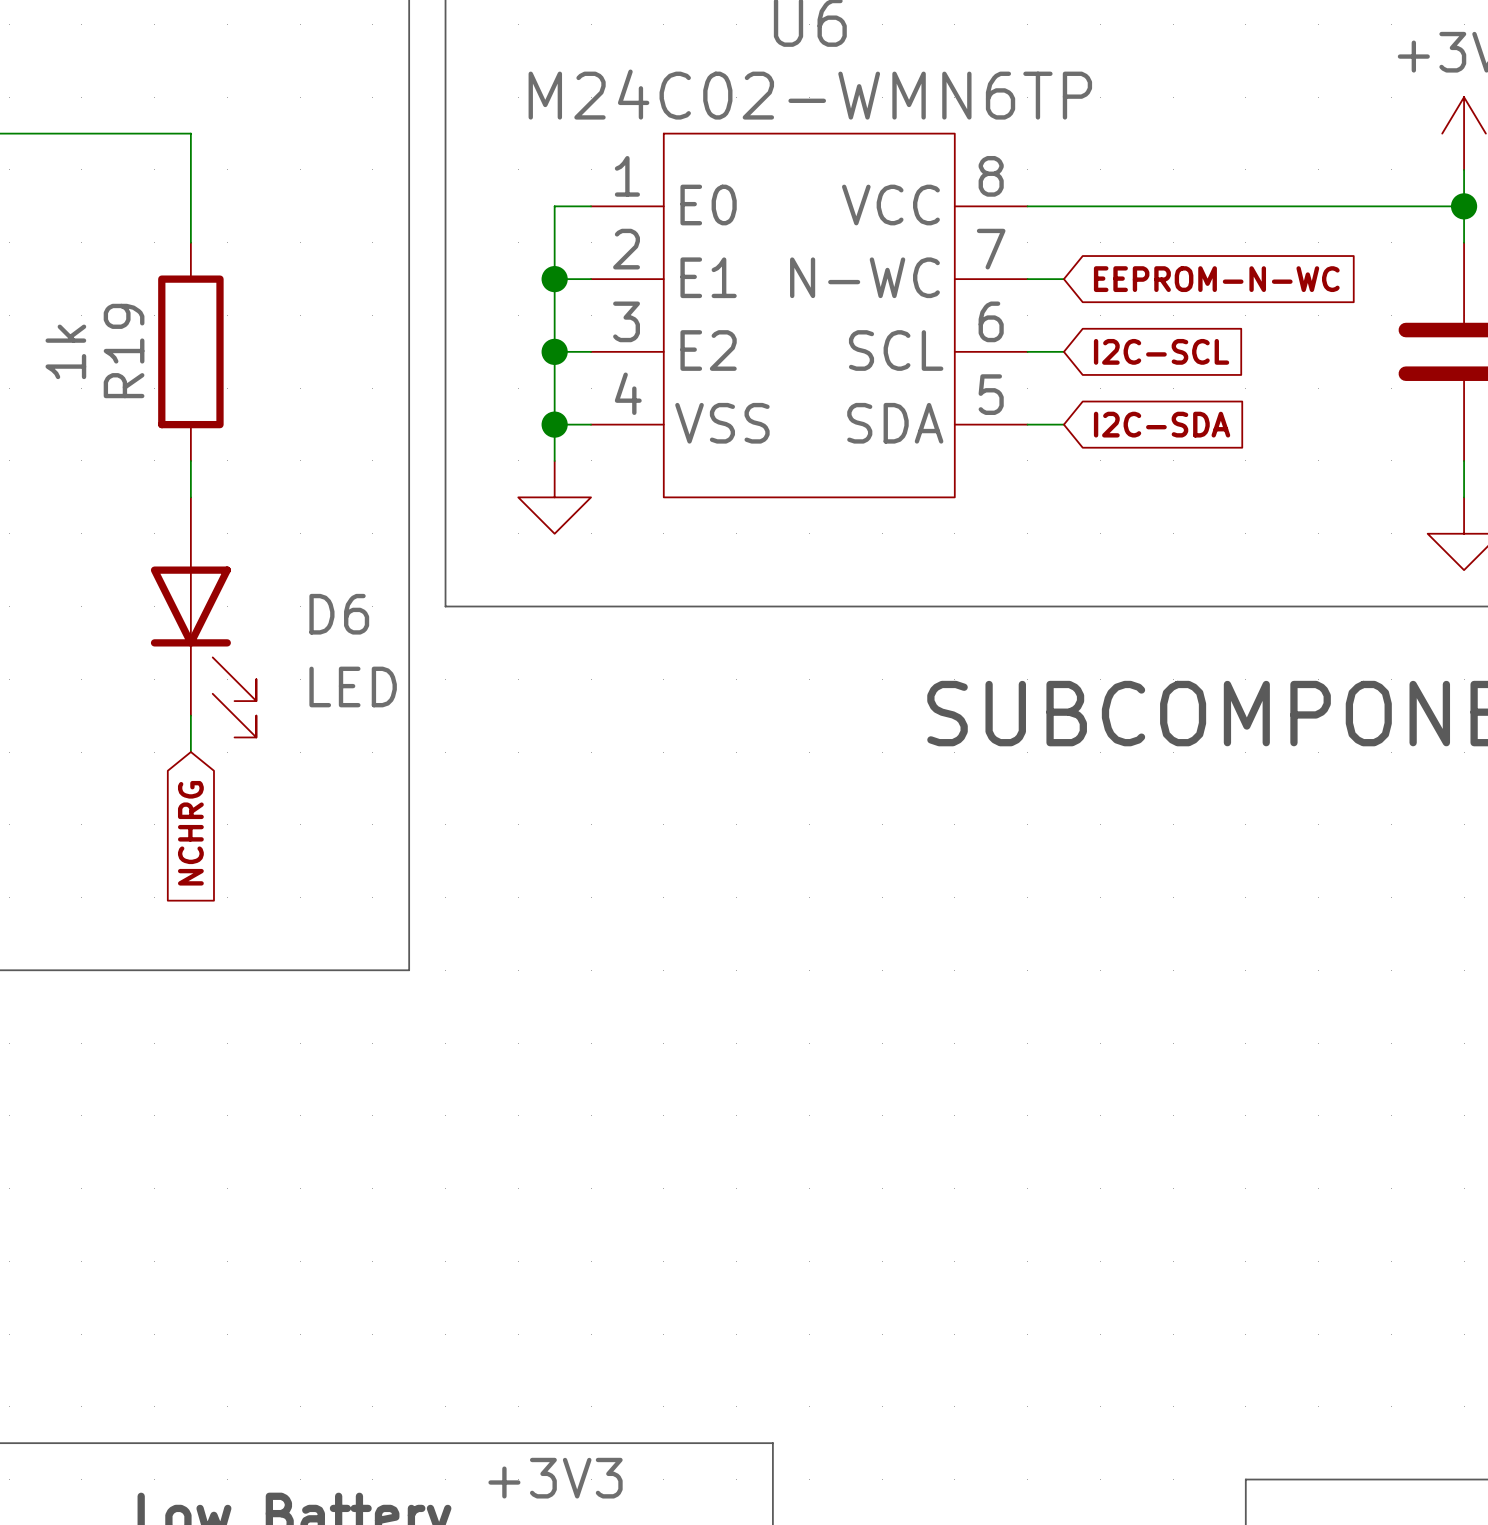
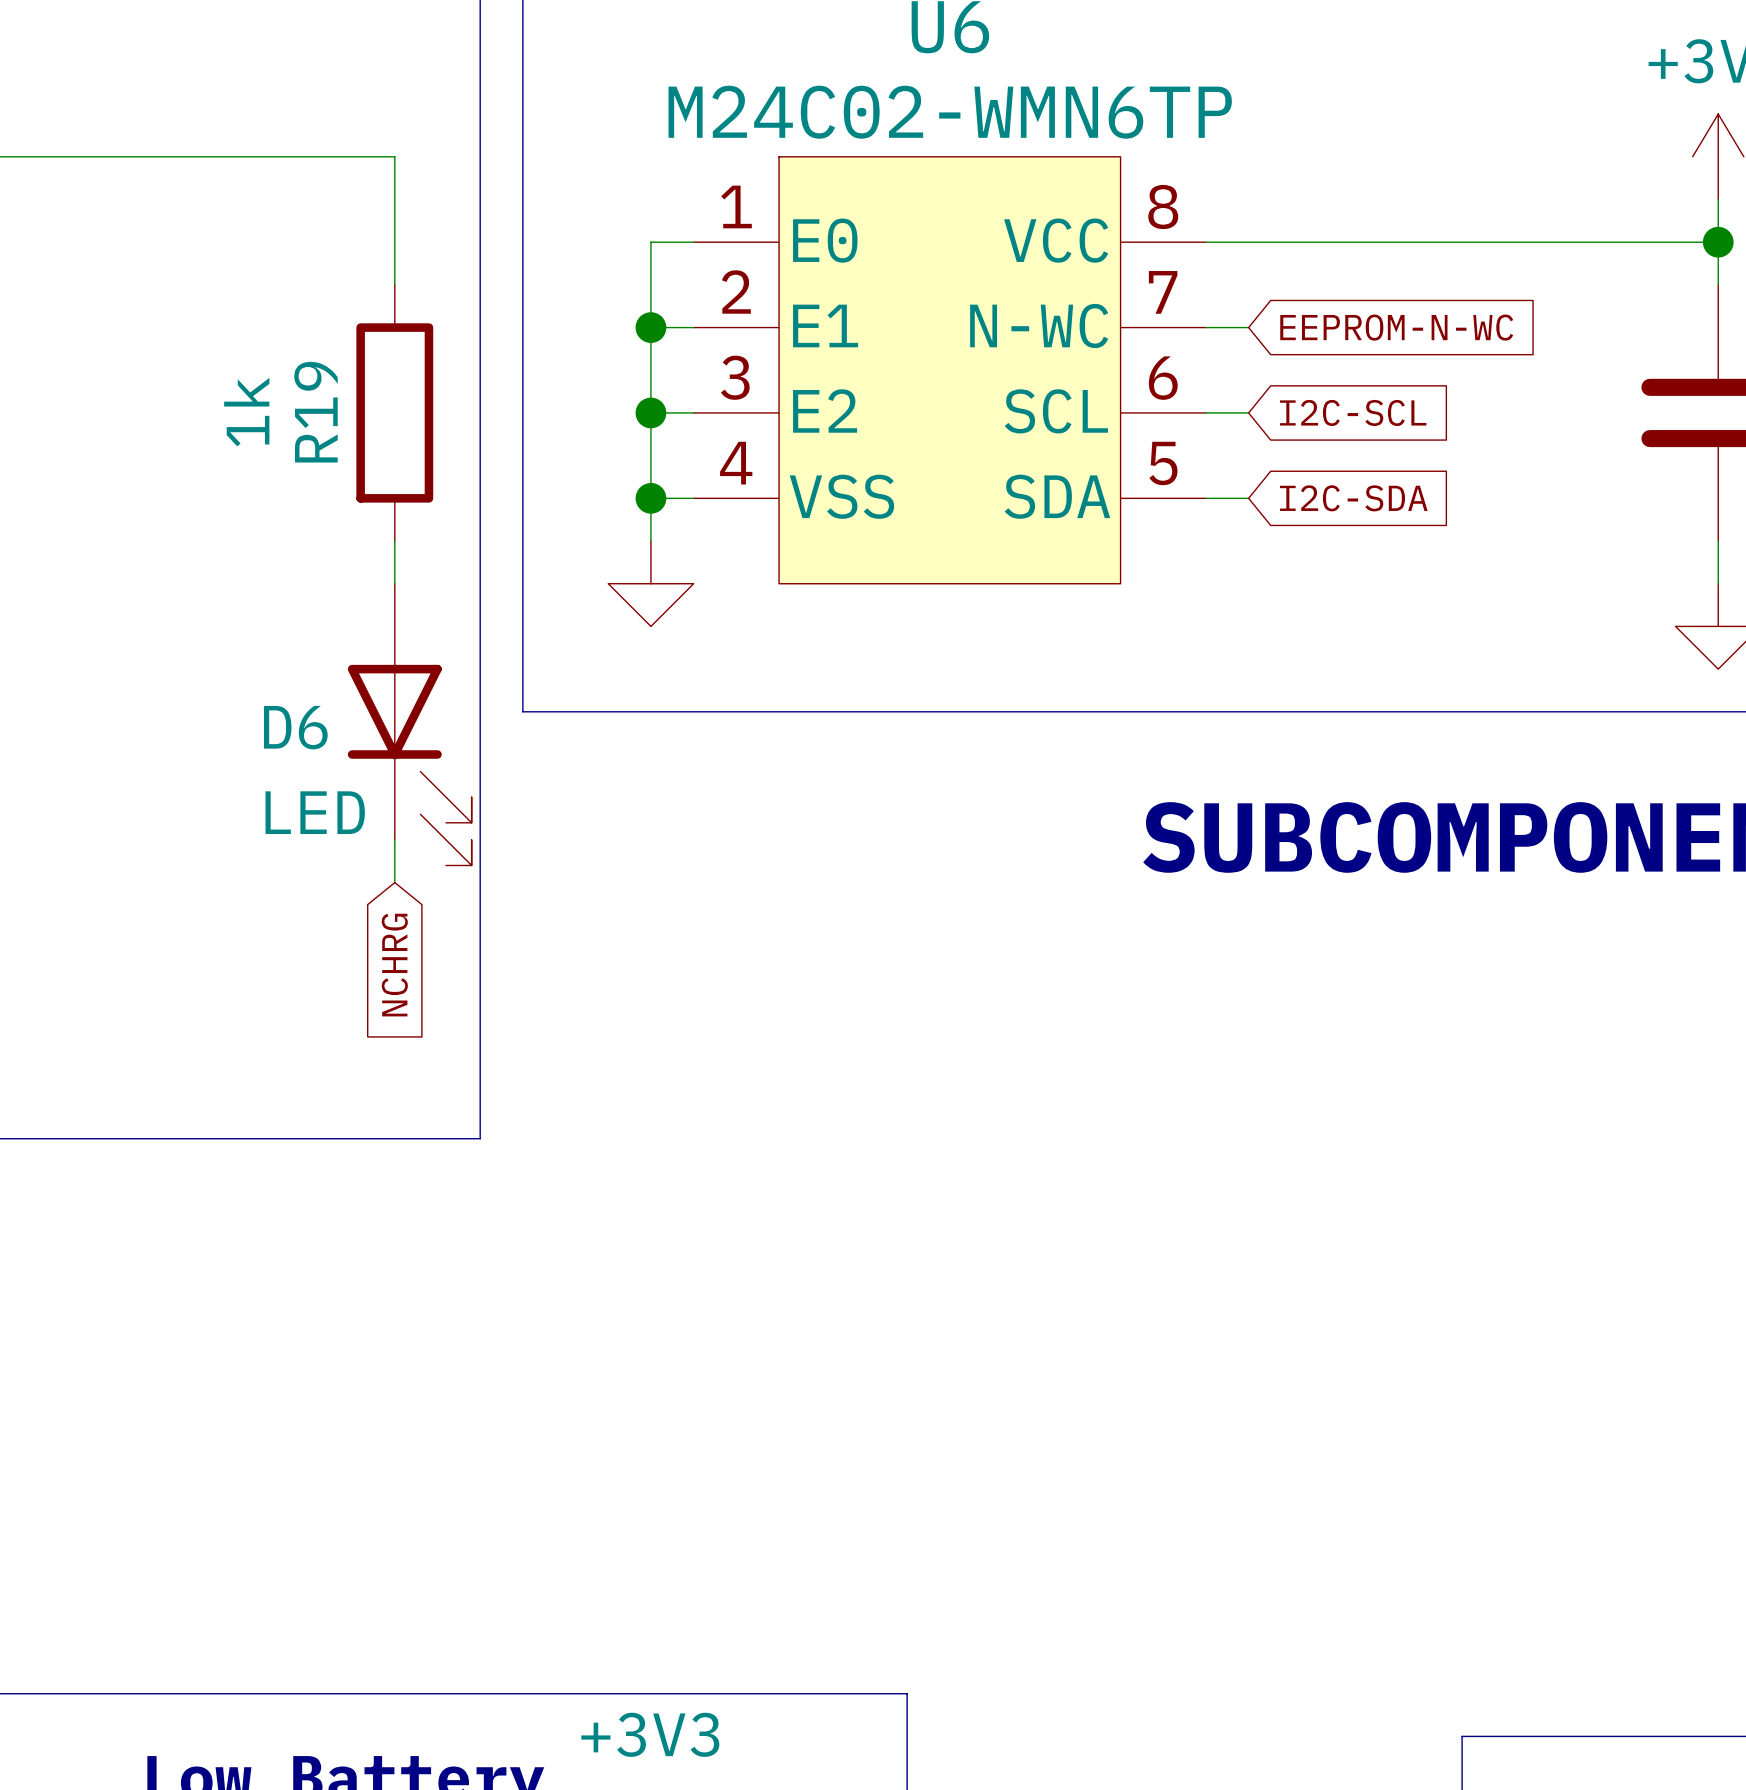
wire: (190, 133) (190, 242) -> (224, 156) (394, 156) (394, 284)
R19 position: (190, 351) -> (394, 412)
wire: (190, 460) (190, 497) -> (394, 541) (394, 583)
D6 name position: D6 (339, 614) -> D6 (295, 727)
D6 position: (203, 617) -> (409, 724)
D6 value position: LED (353, 686) -> LED (315, 812)
wire: (190, 715) (190, 752) -> (394, 839) (394, 882)
global label position: NCHRG (190, 833) -> NCHRG (394, 965)

